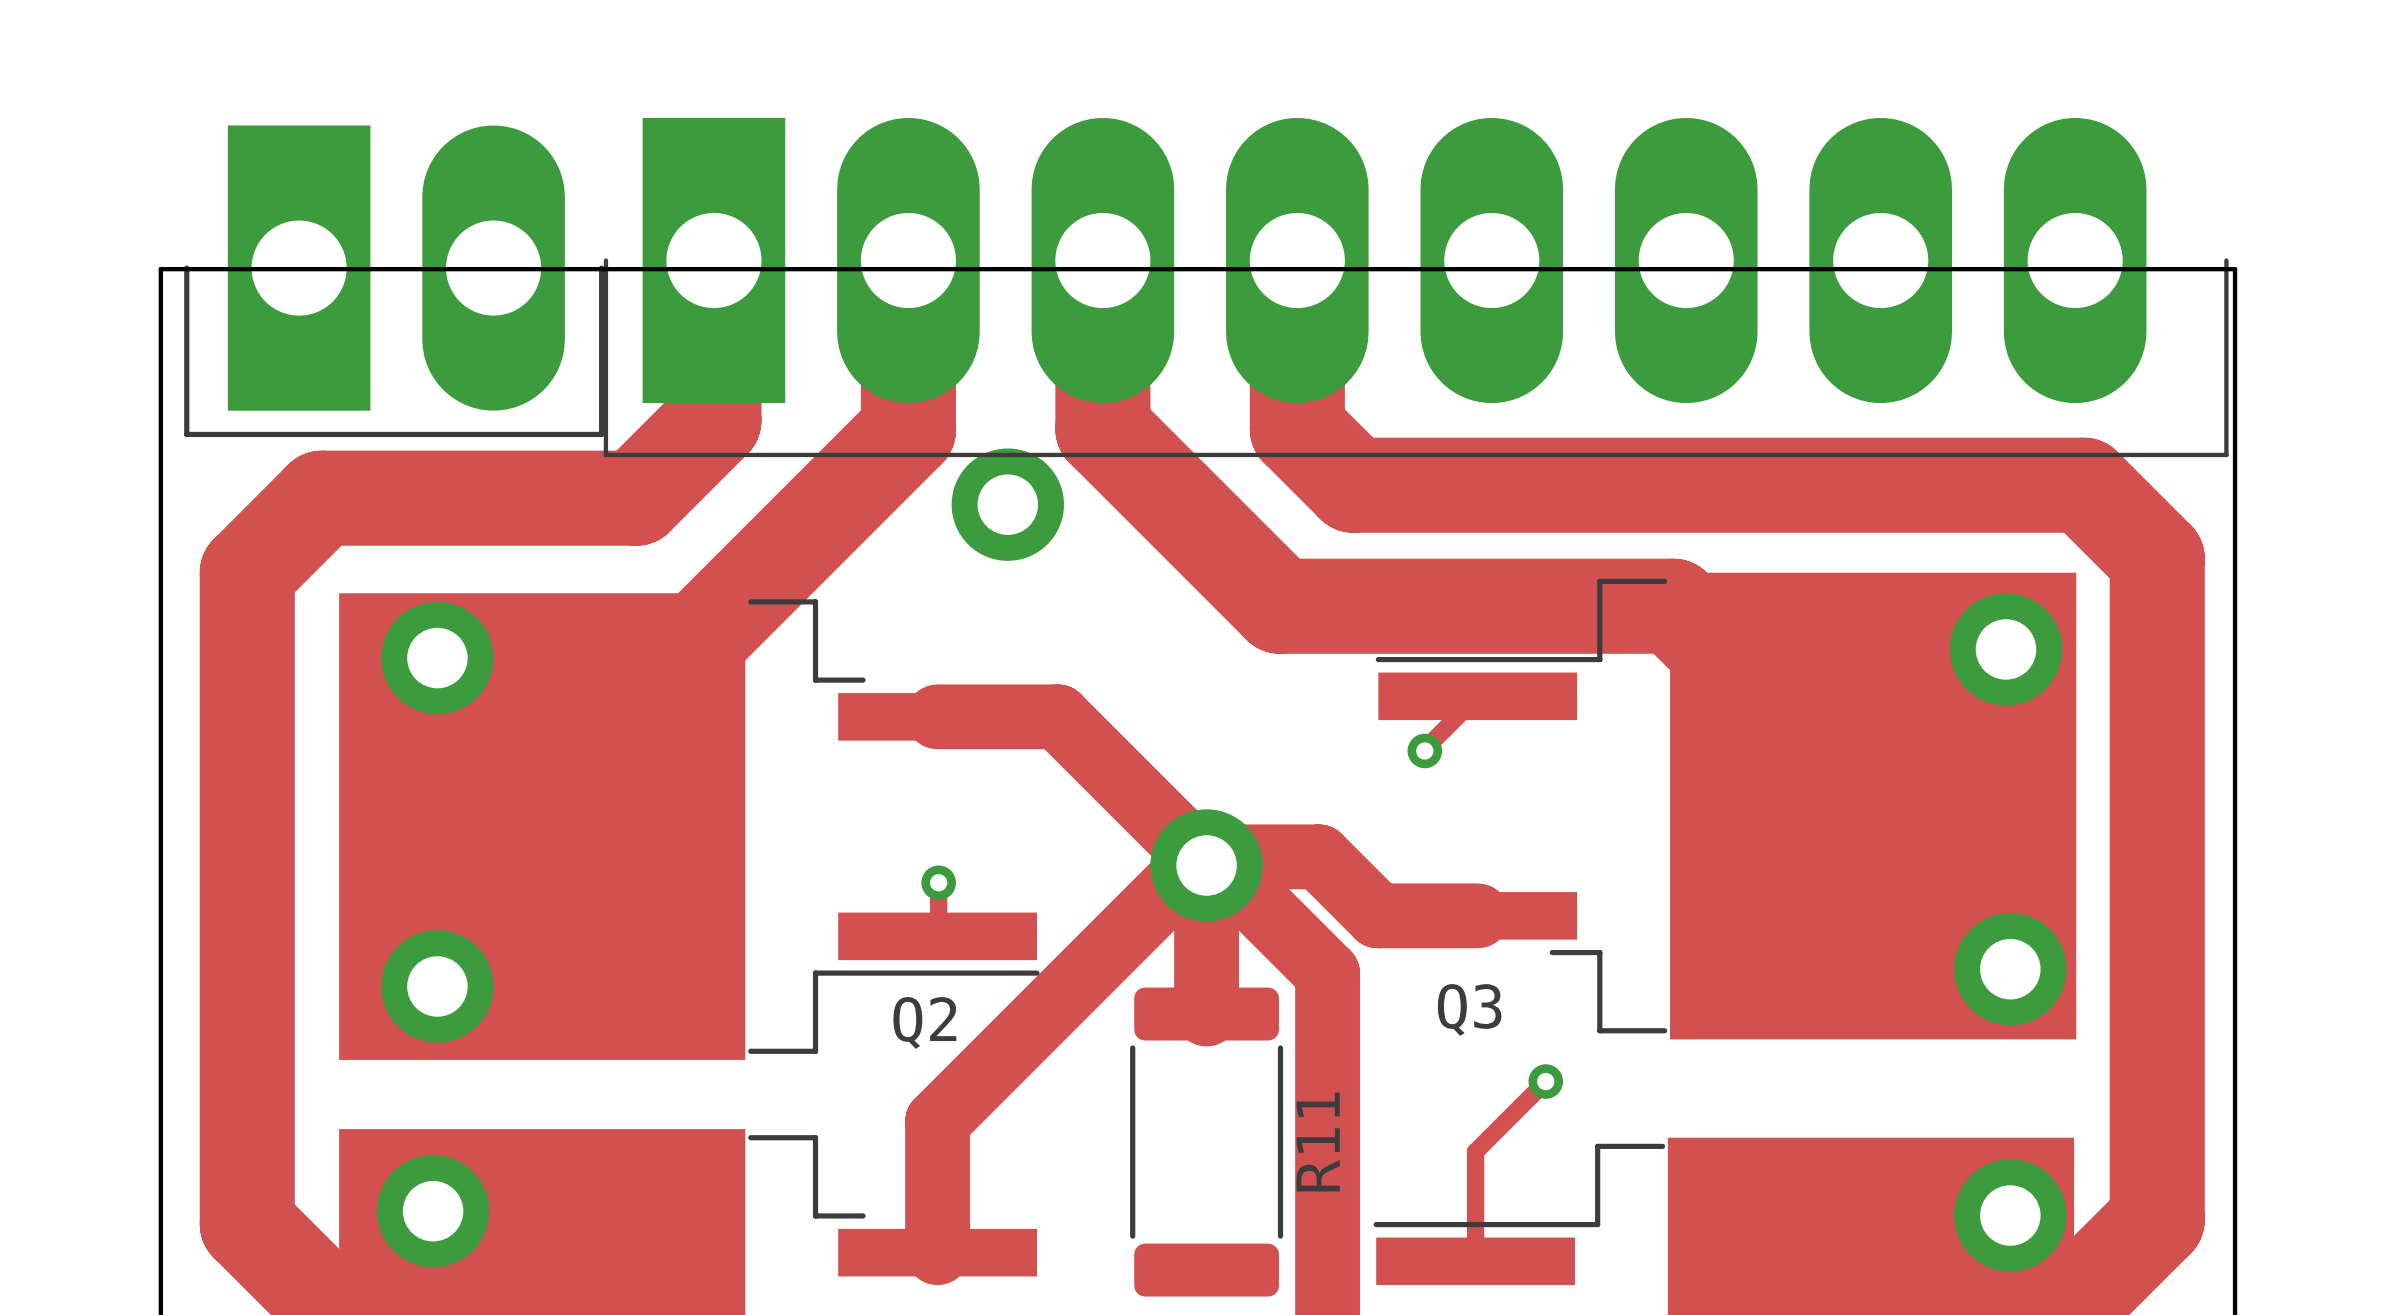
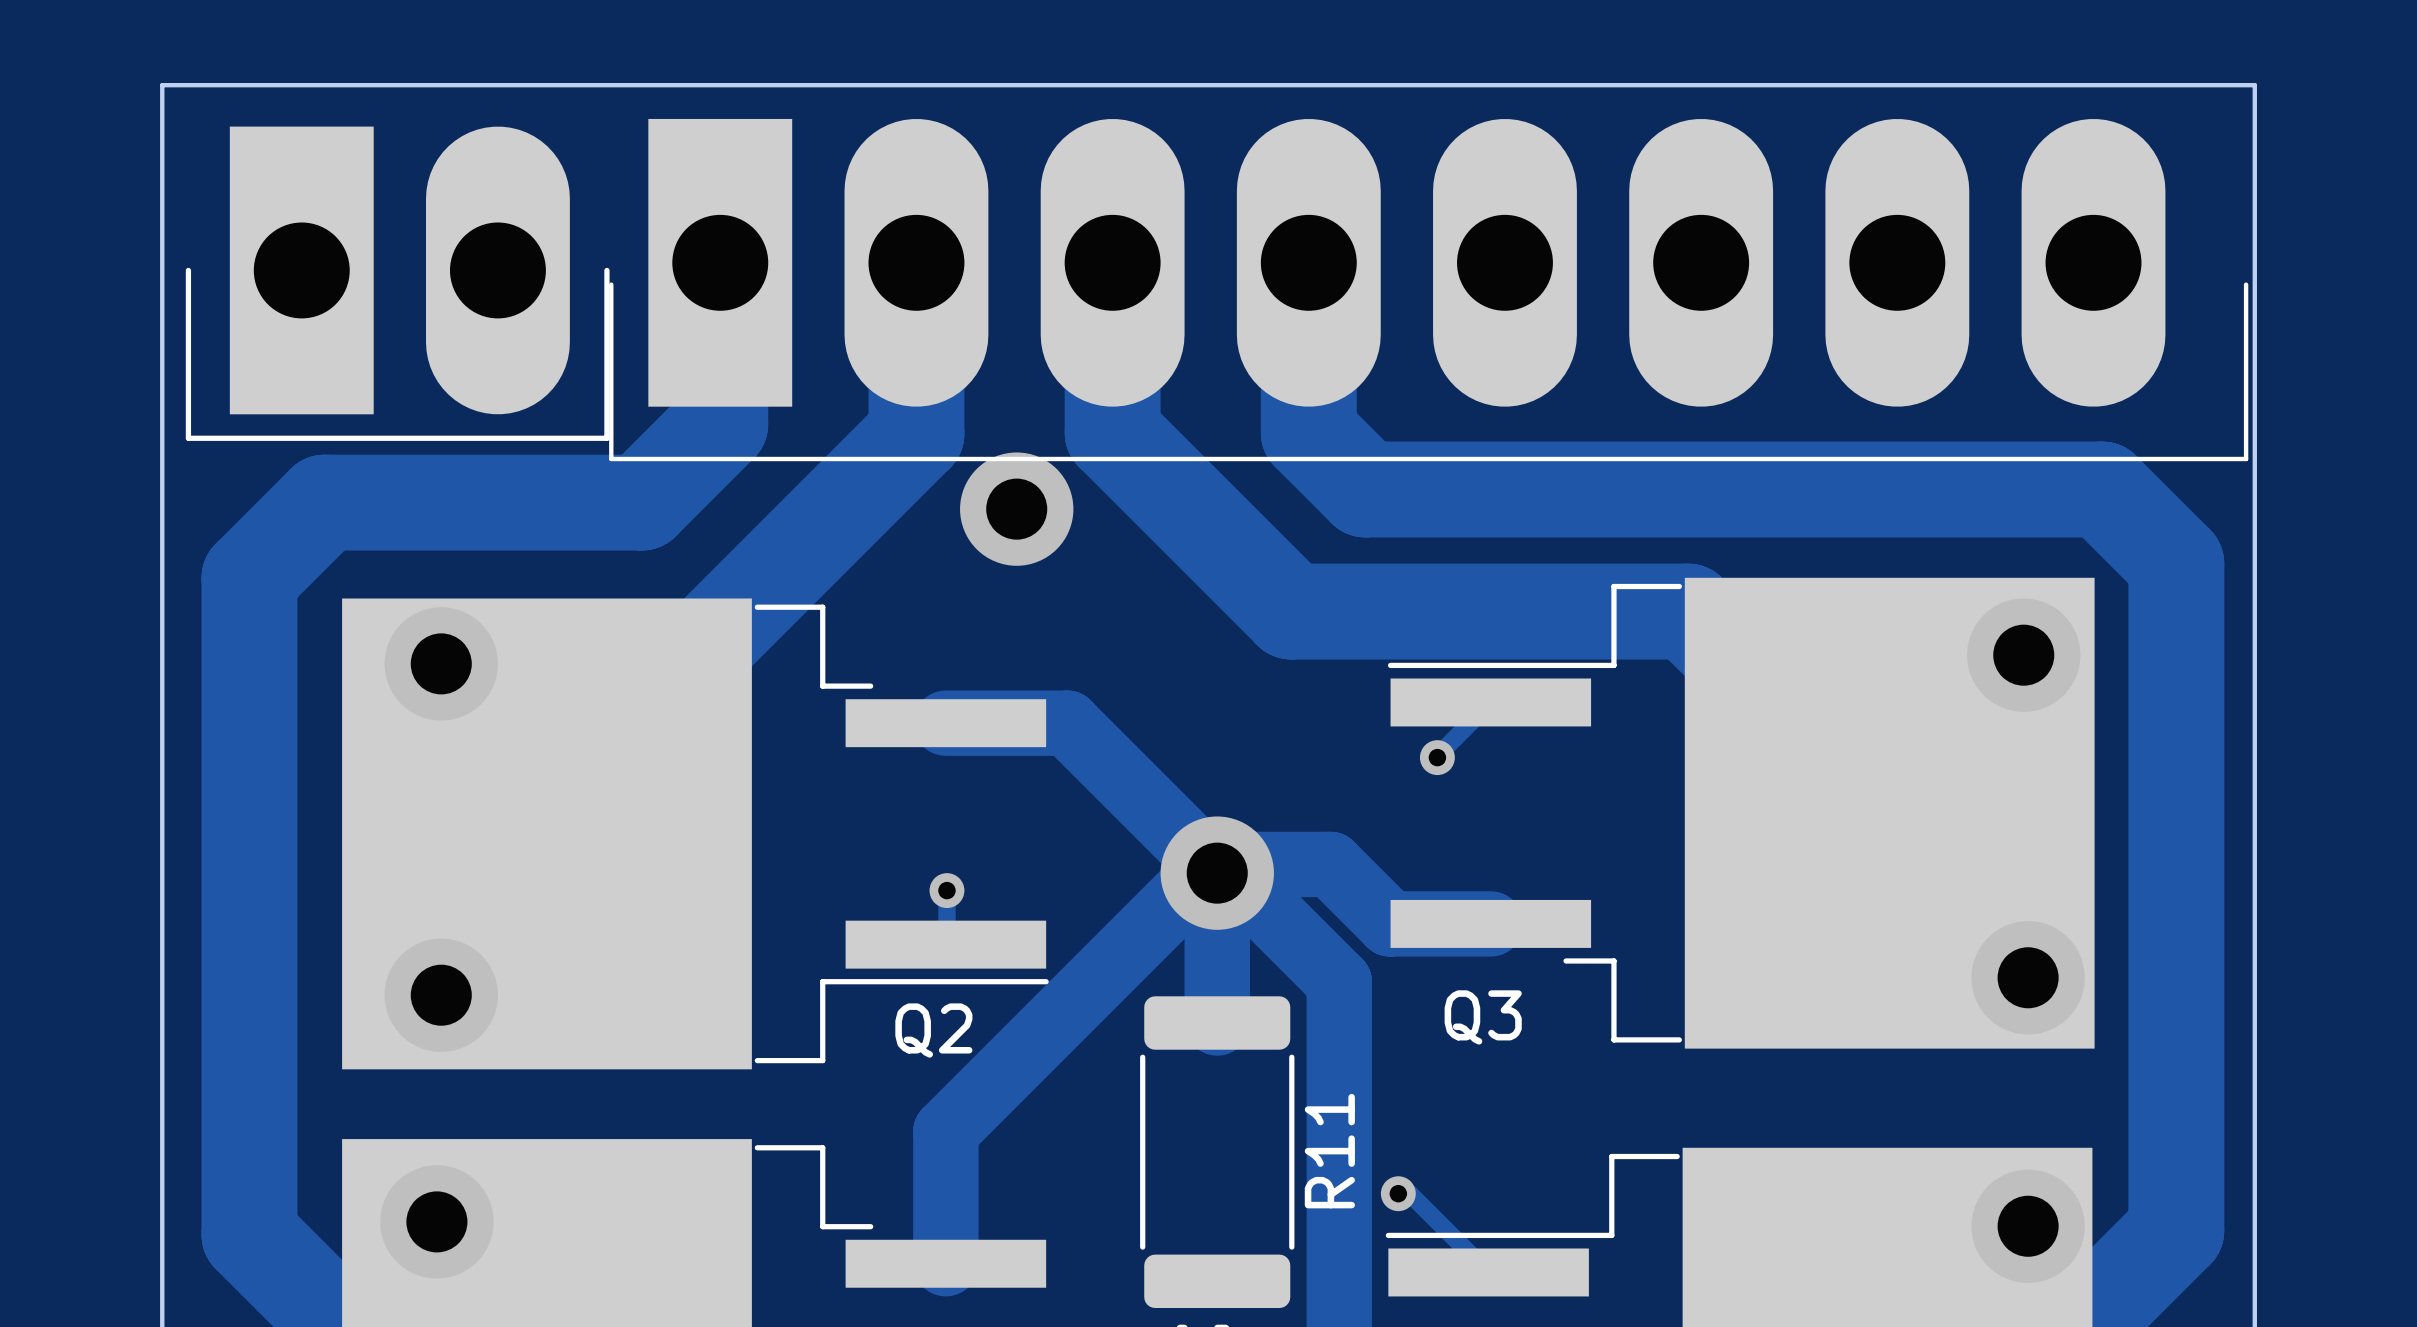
part footprint: [603, 117, 2229, 458] -> [609, 118, 2249, 462]
board edge: (160, 269) (2235, 269) -> (162, 271) (162, 85) (2254, 85) (2254, 271)
track: (1545, 1081) (1475, 1151) (1475, 1261) -> (1398, 1193) (1409, 1193) (1488, 1272)
via: (1545, 1081) -> none
via: none -> (1398, 1193)

